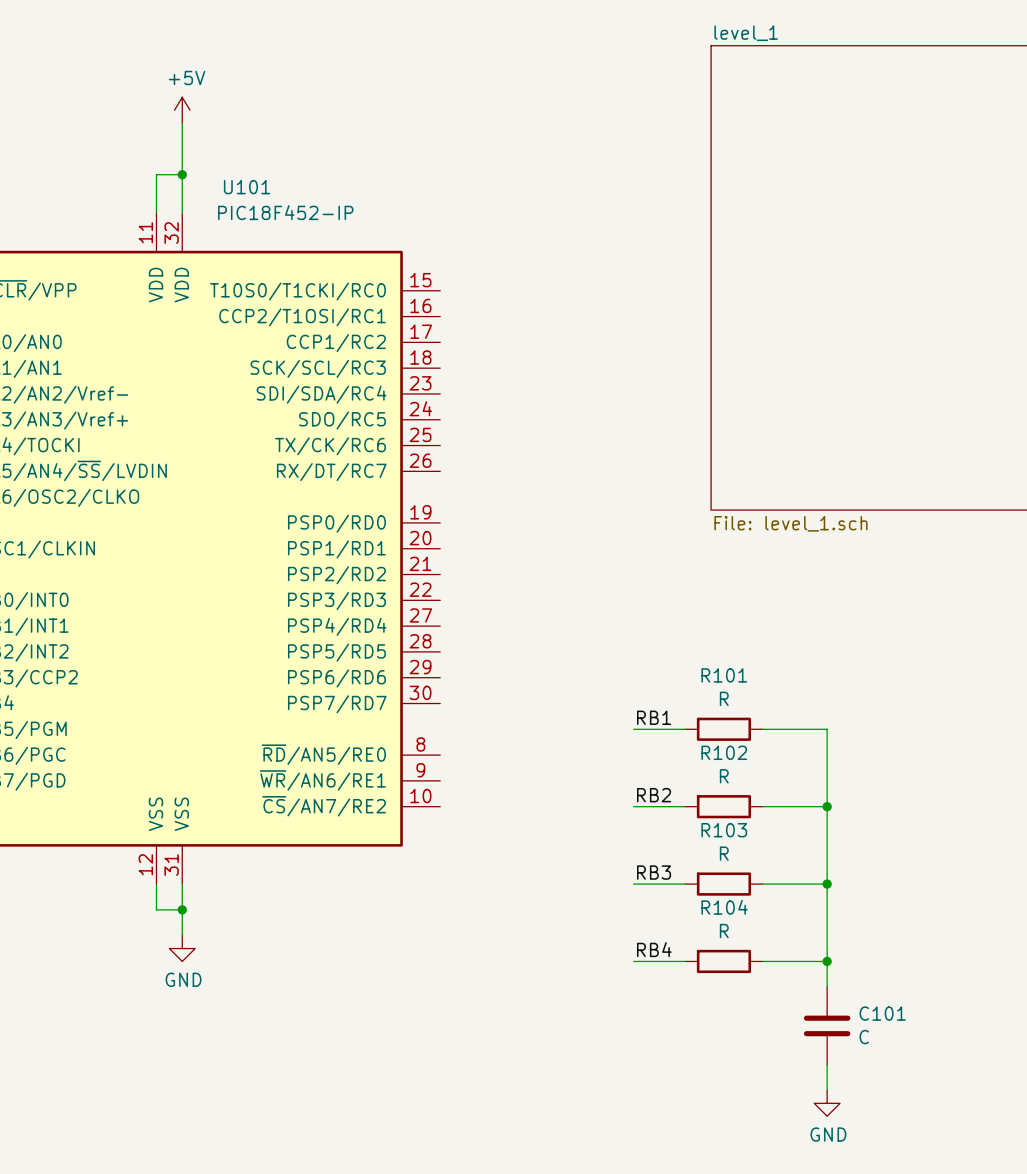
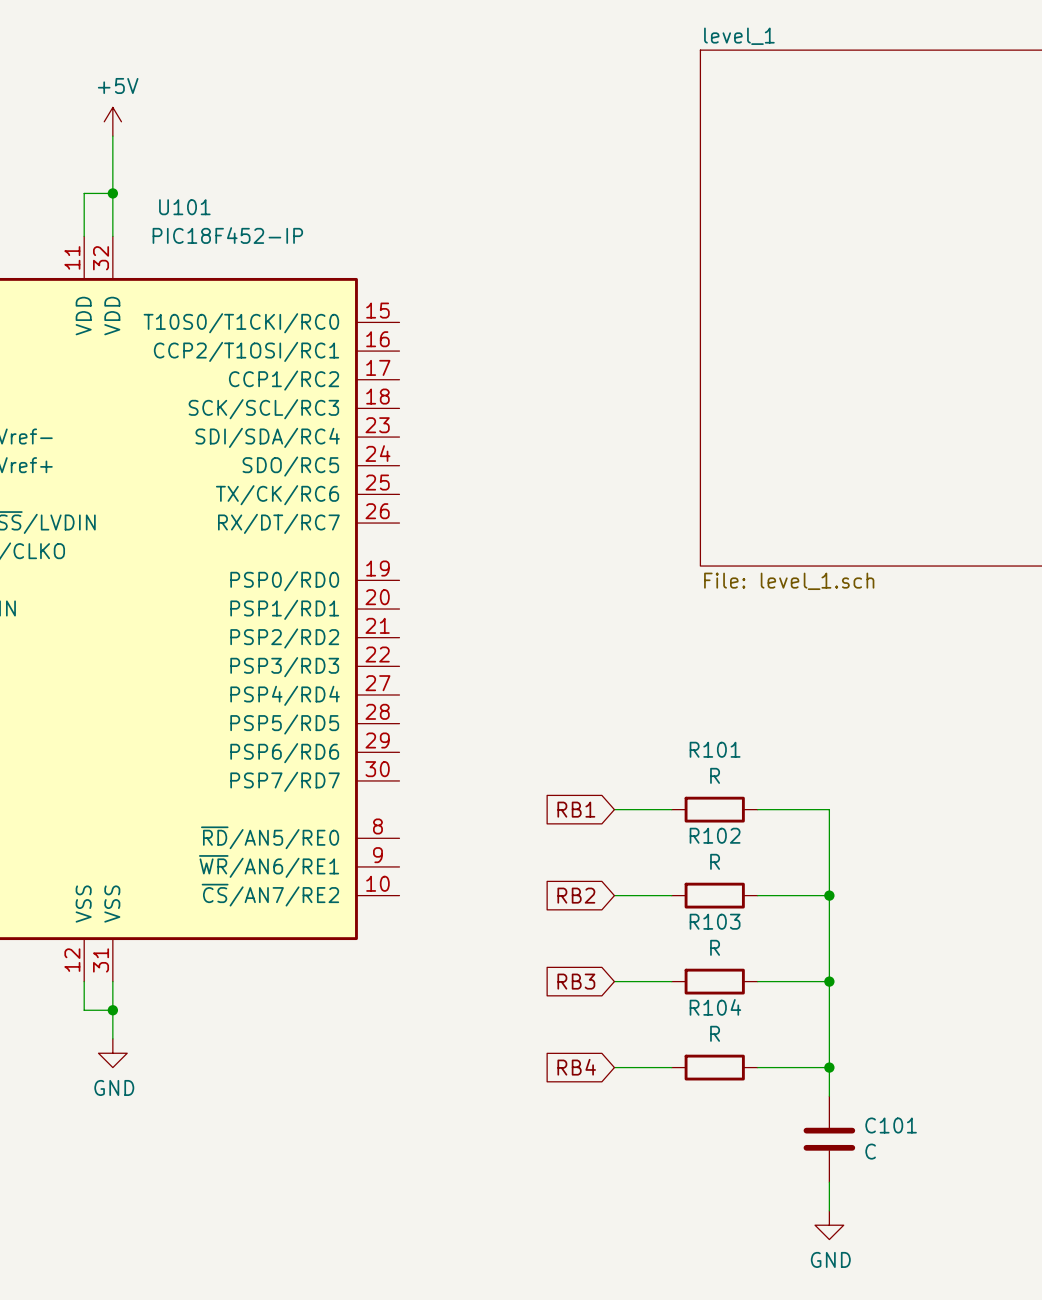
label: RB1 (654, 717) -> none
global label: none -> RB1 (576, 809)
label: RB2 (654, 795) -> none
global label: none -> RB2 (576, 895)
label: RB3 (654, 872) -> none
global label: none -> RB3 (576, 981)
label: RB4 (654, 949) -> none
global label: none -> RB4 (576, 1067)

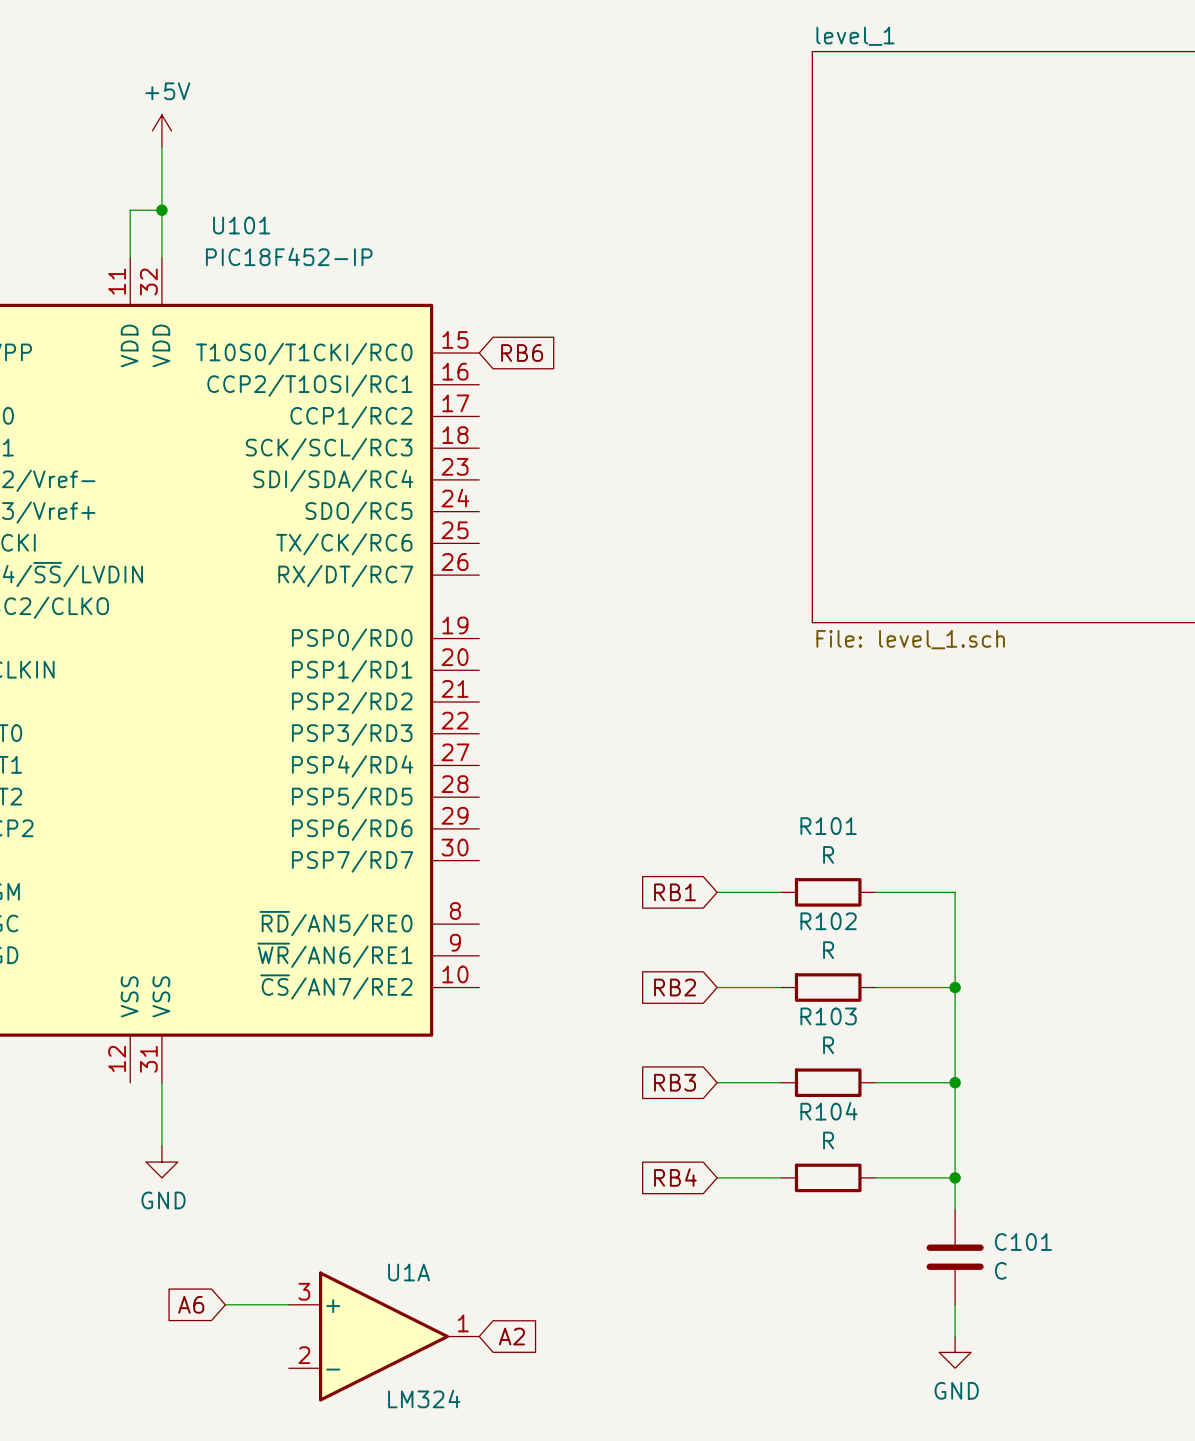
global label: none -> RB6 (522, 353)
wire: (84, 981) (84, 1010) (112, 1010) -> none
junction: (112, 1010) -> none
global label: none -> A6 (191, 1304)
wire: none -> (225, 1304) (288, 1304)
U1A: none -> LM324 (384, 1336)
global label: none -> A2 (511, 1336)

